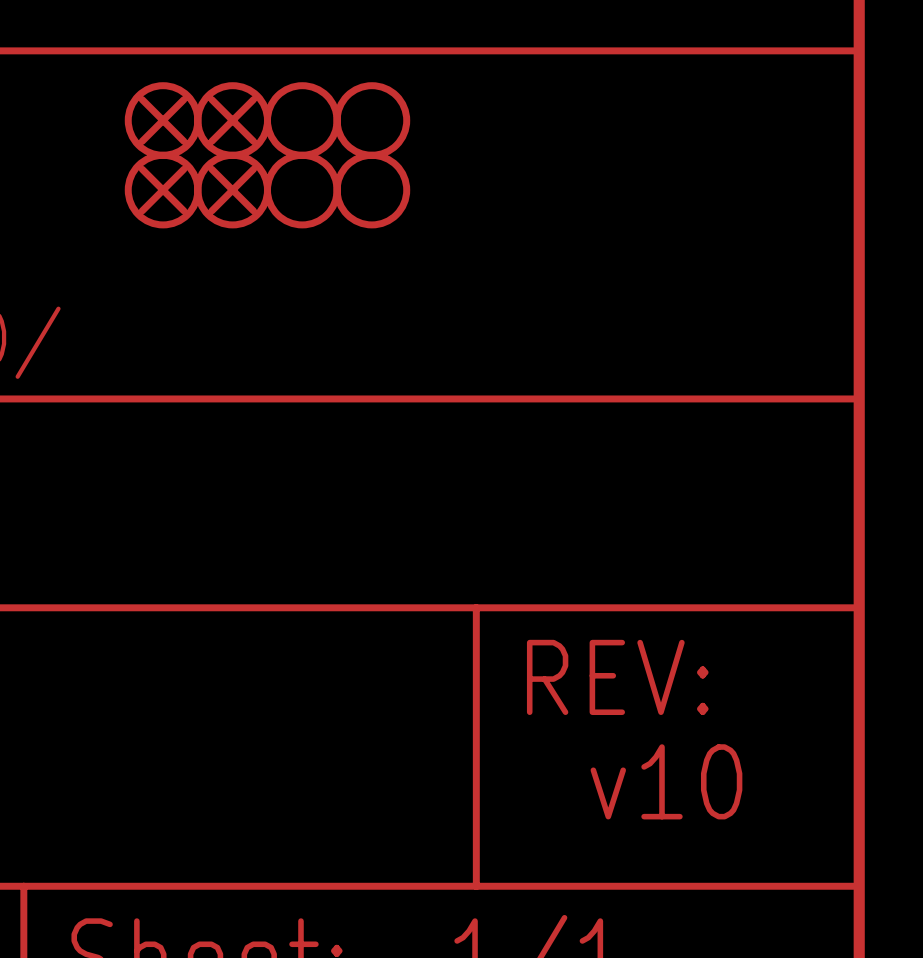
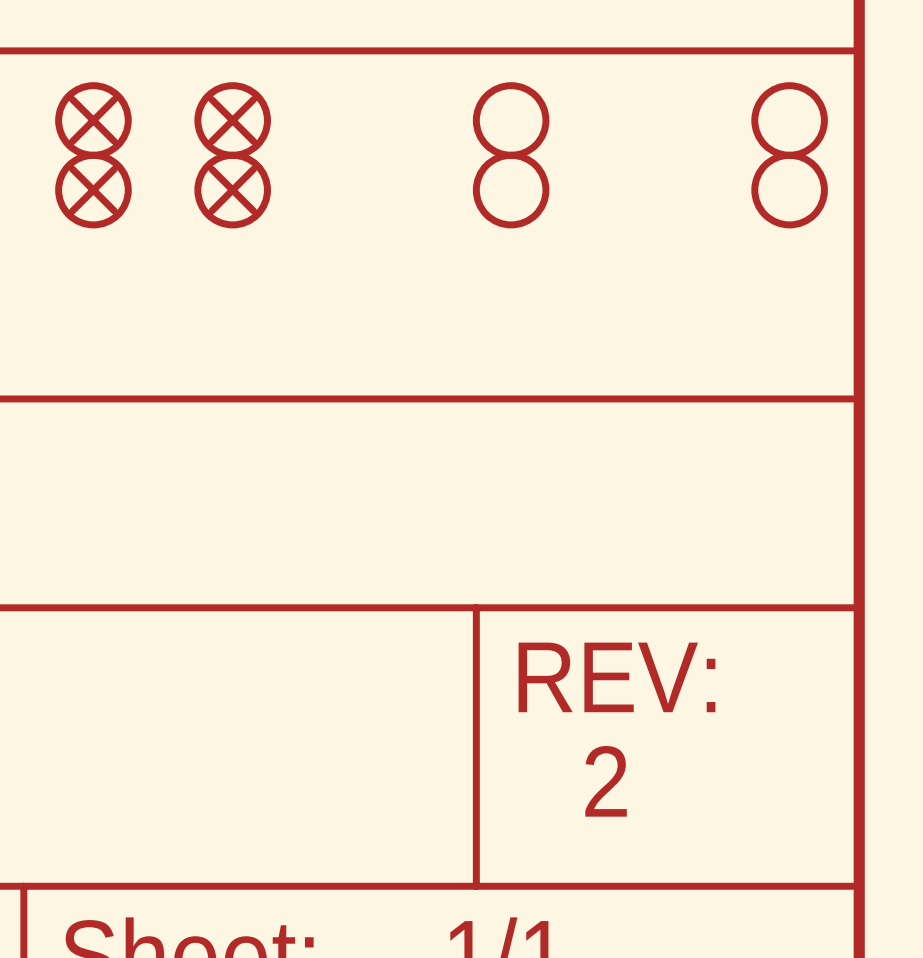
part: none -> (93, 120)
part: (163, 120) -> none
part: (302, 120) -> none
part: (371, 120) -> none
part: none -> (511, 120)
part: none -> (789, 120)
part: none -> (93, 190)
part: (163, 190) -> none
part: (302, 190) -> none
part: (371, 190) -> none
part: none -> (511, 190)
part: none -> (789, 190)
text: v10 (666, 781) -> 2 (606, 781)

